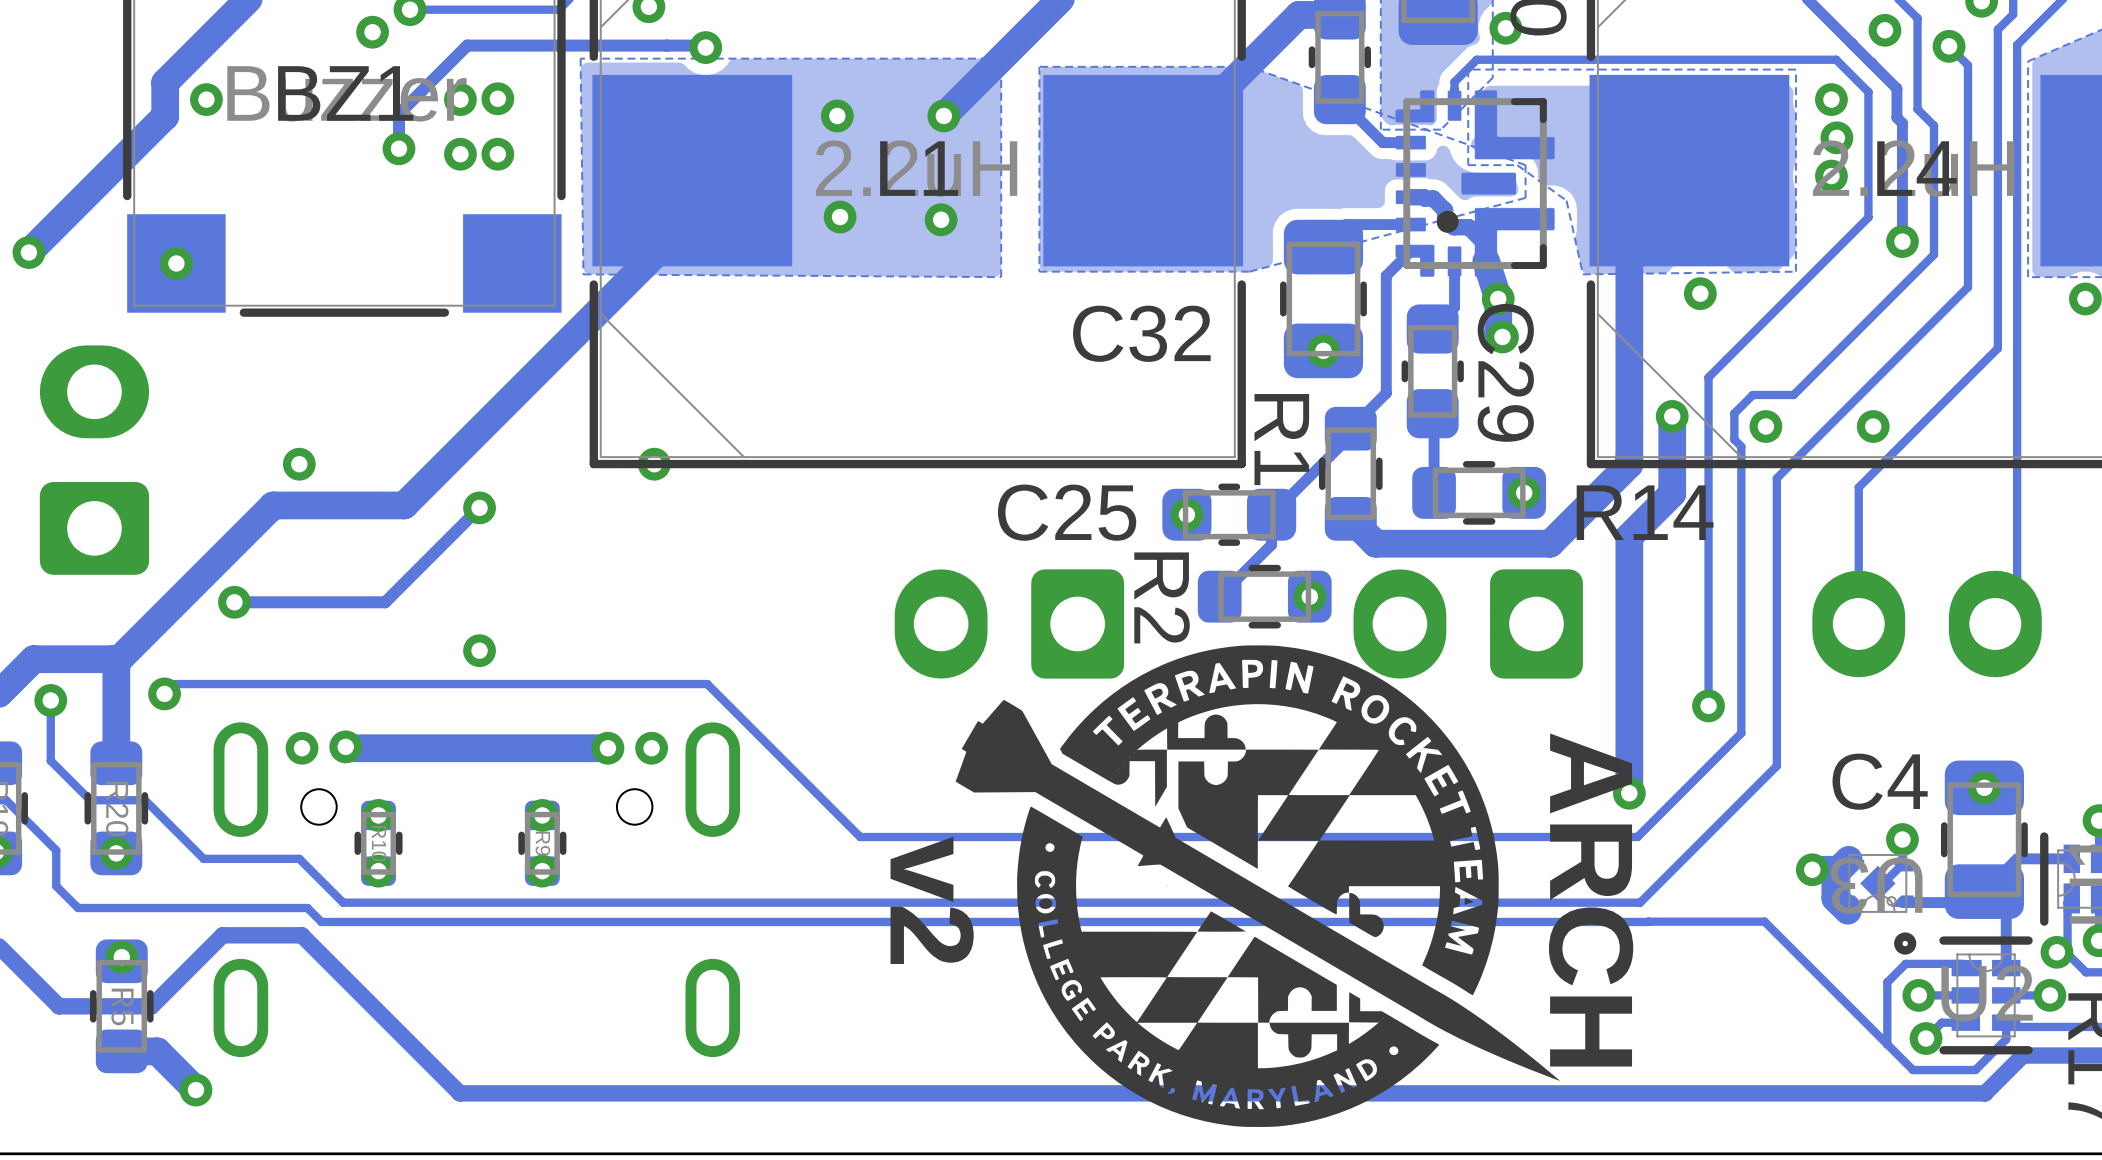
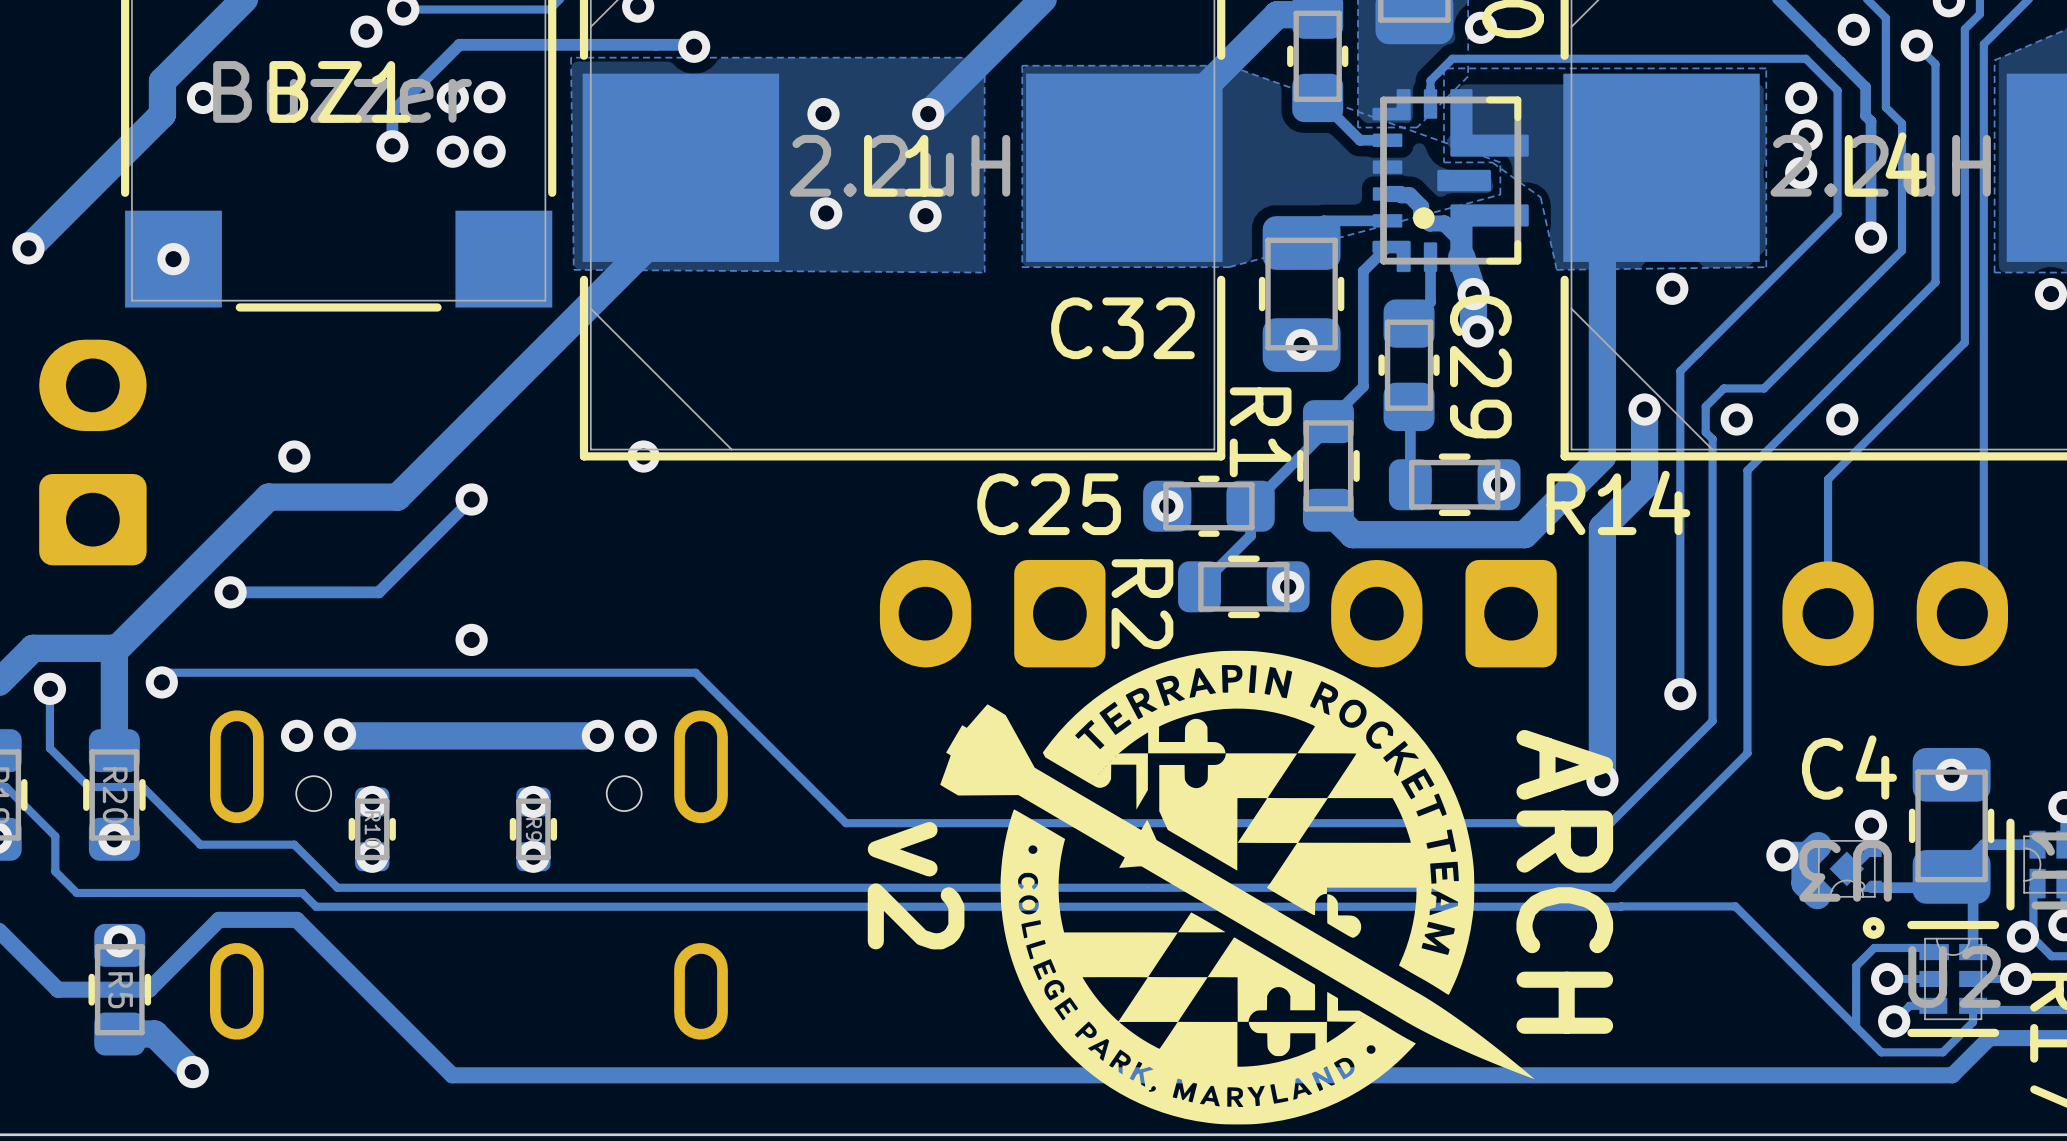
R2 name position: R2 (1162, 597) -> R2 (1142, 604)
drawing position: (1257, 886) -> (1237, 887)

